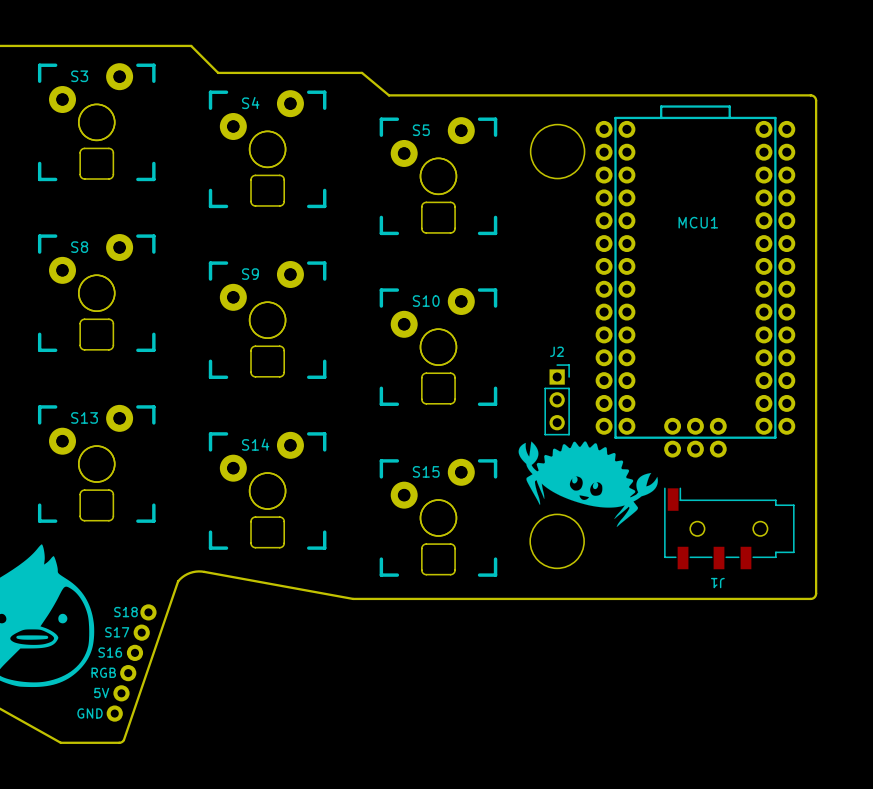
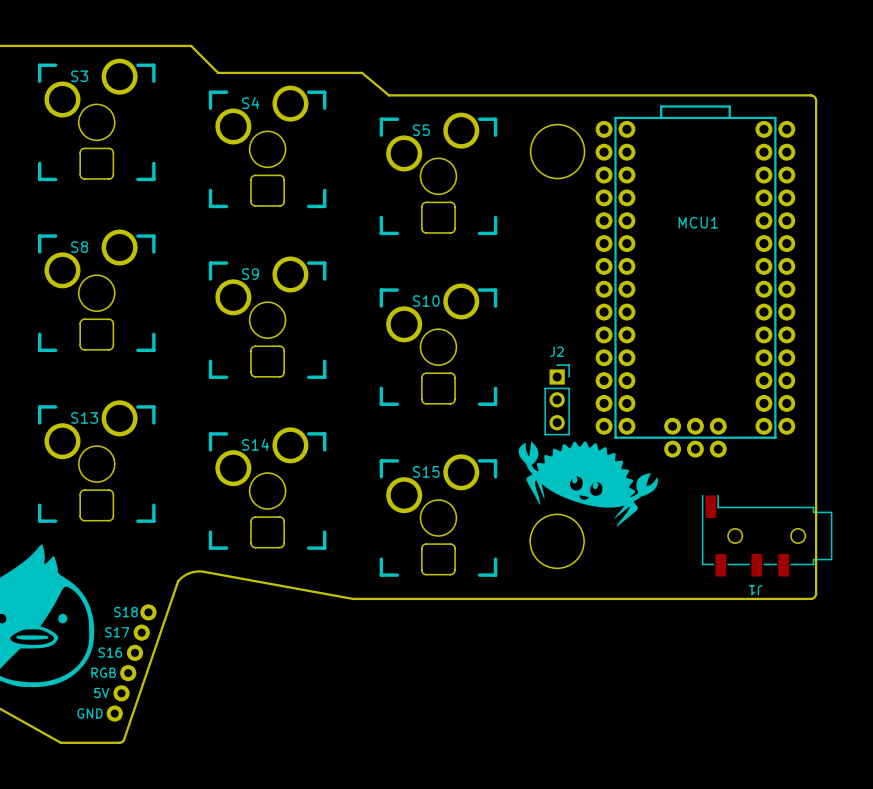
S3 footprint: [37, 63, 156, 182] -> [37, 58, 156, 182]
S4 footprint: [208, 90, 327, 209] -> [208, 85, 327, 209]
S5 footprint: [379, 117, 498, 236] -> [379, 112, 498, 236]
S8 footprint: [37, 234, 156, 353] -> [37, 229, 156, 353]
S9 footprint: [208, 261, 327, 379] -> [208, 256, 327, 379]
S10 footprint: [379, 287, 498, 406] -> [379, 283, 498, 406]
S13 footprint: [37, 404, 156, 523] -> [37, 400, 156, 523]
S14 footprint: [208, 431, 327, 550] -> [208, 427, 327, 550]
S15 footprint: [379, 458, 498, 577] -> [379, 454, 498, 577]
J1 position: (729, 528) -> (767, 535)

